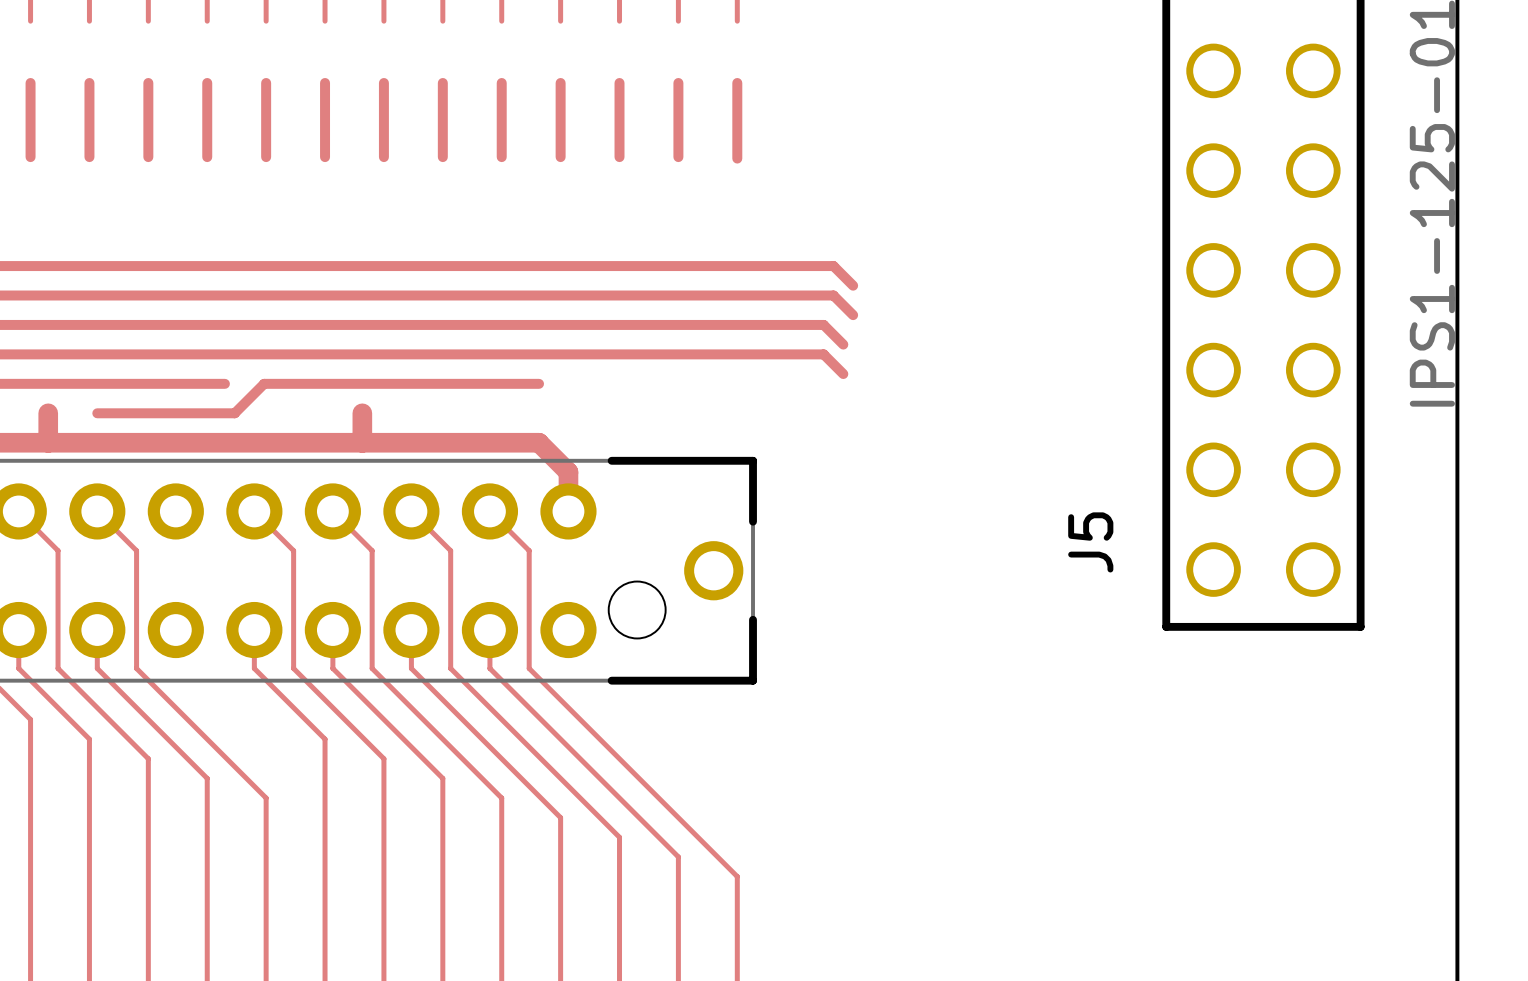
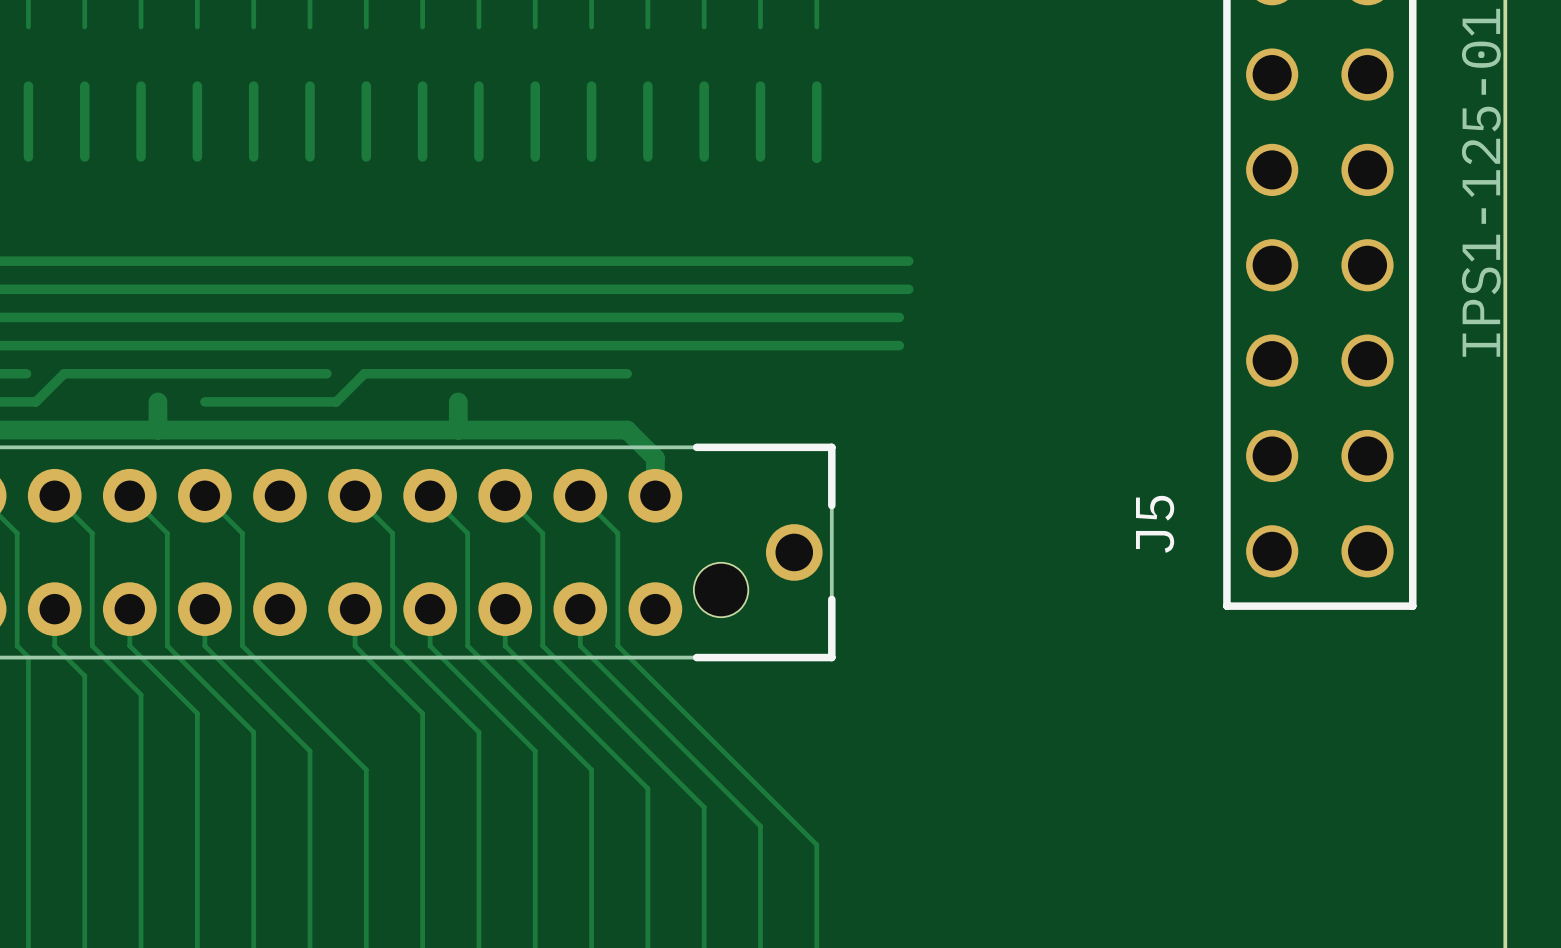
track: (833, 266) (853, 285) -> none
track: (833, 295) (853, 315) -> none
track: (823, 324) (843, 344) -> none
track: (823, 354) (843, 374) -> none

